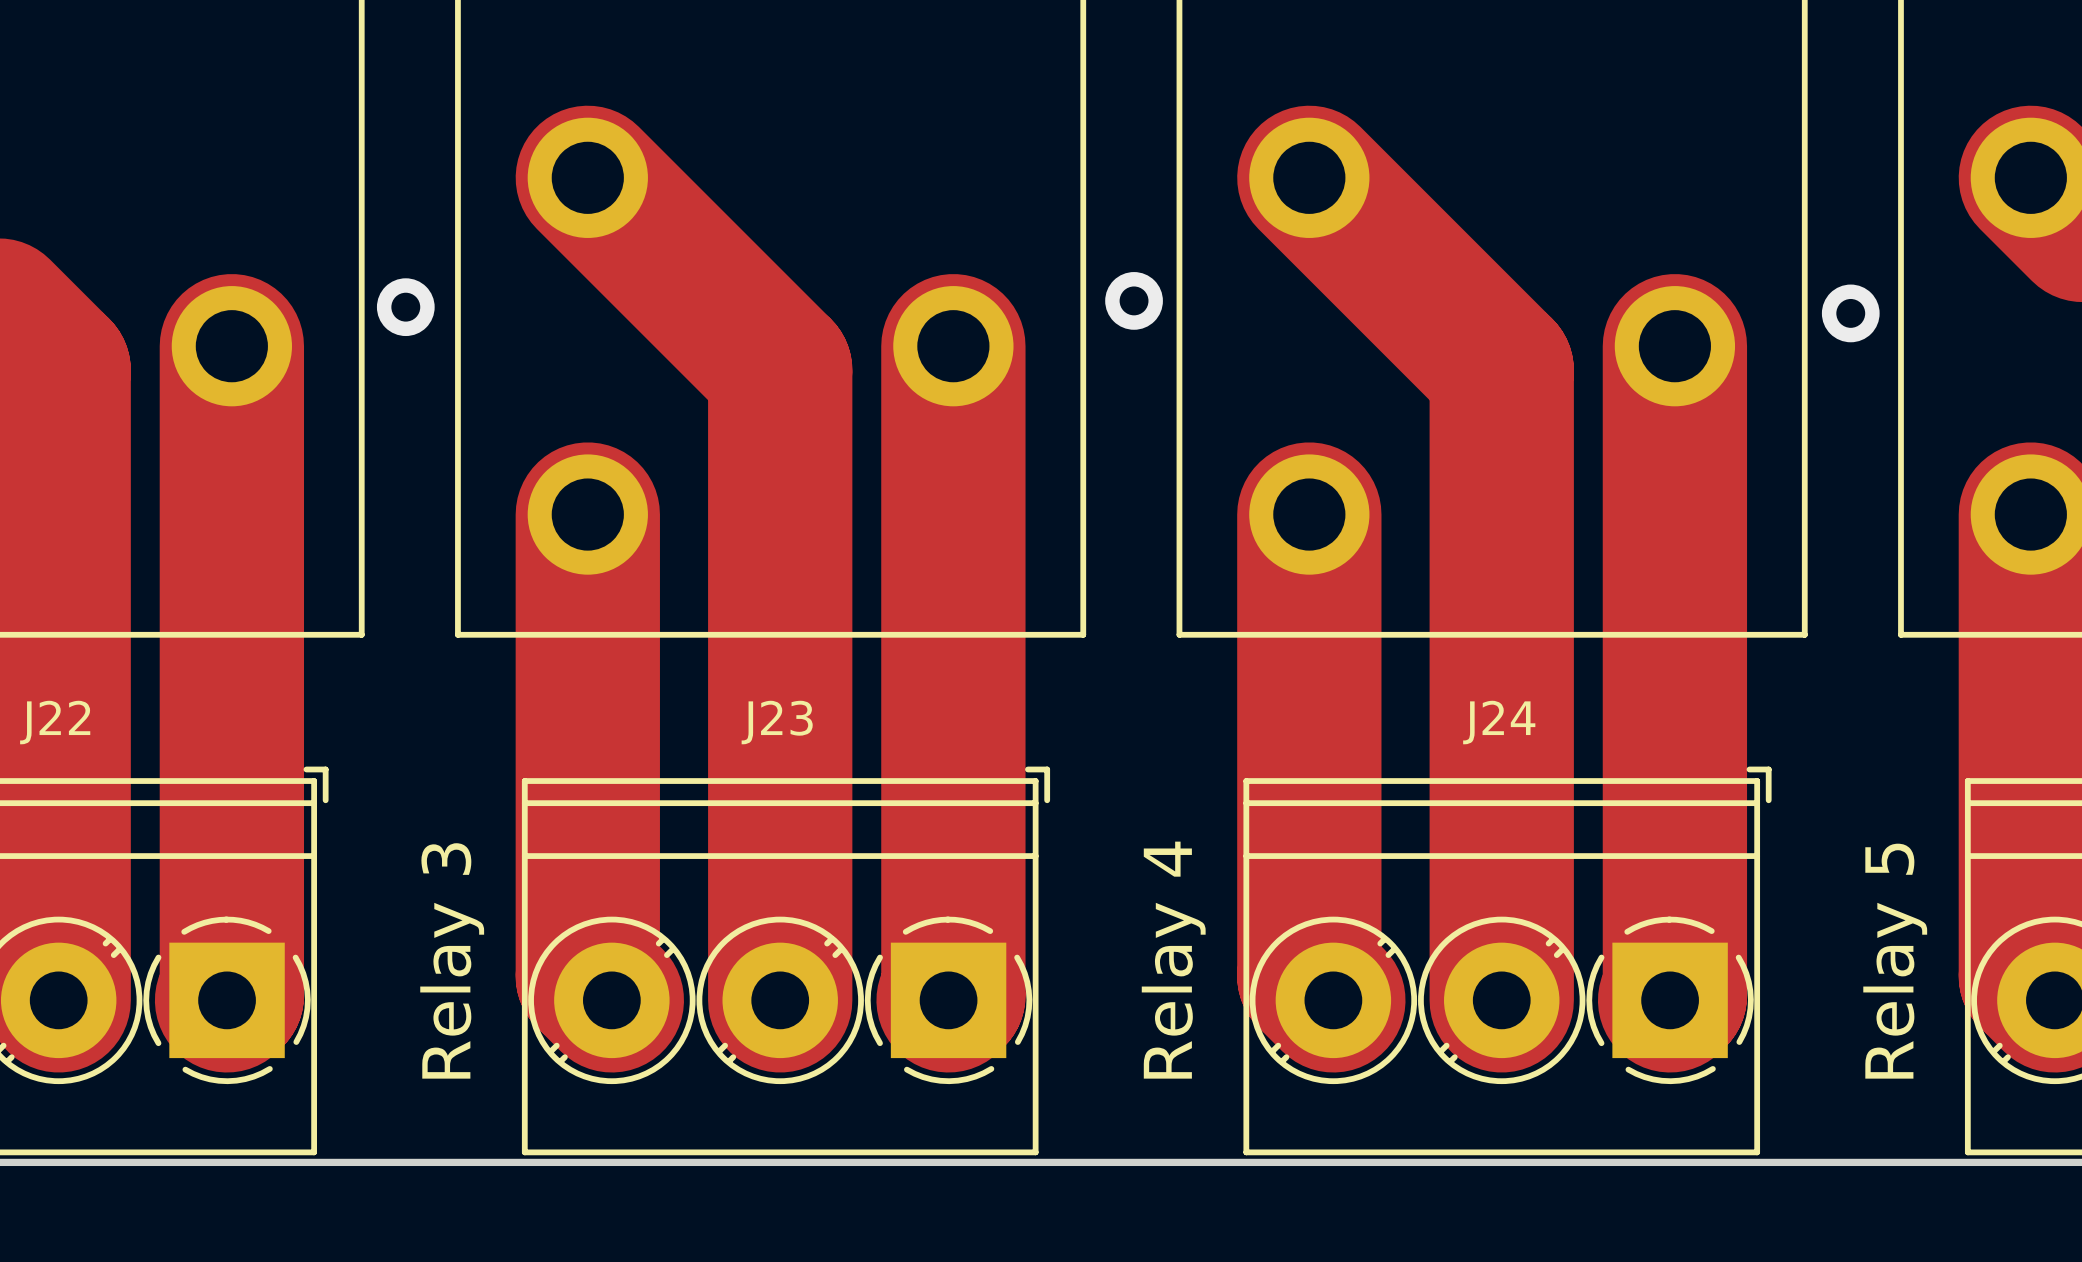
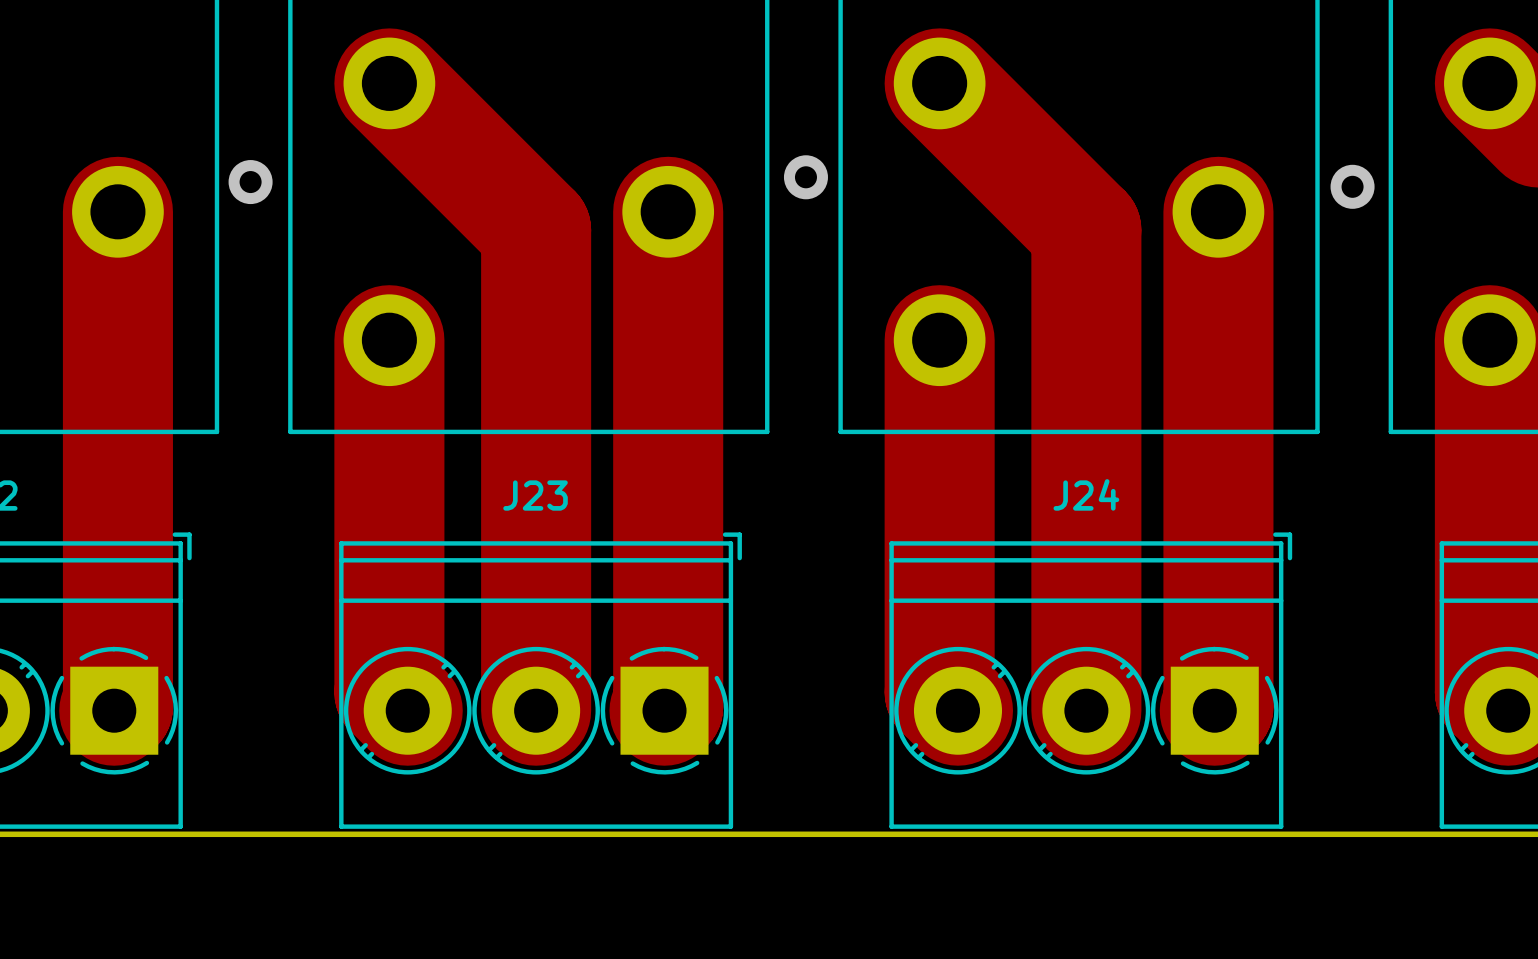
J23 text: Relay 3 (452, 960) -> none
J24 text: Relay 4 (1173, 960) -> none
part text: Relay 5 (1895, 961) -> none

